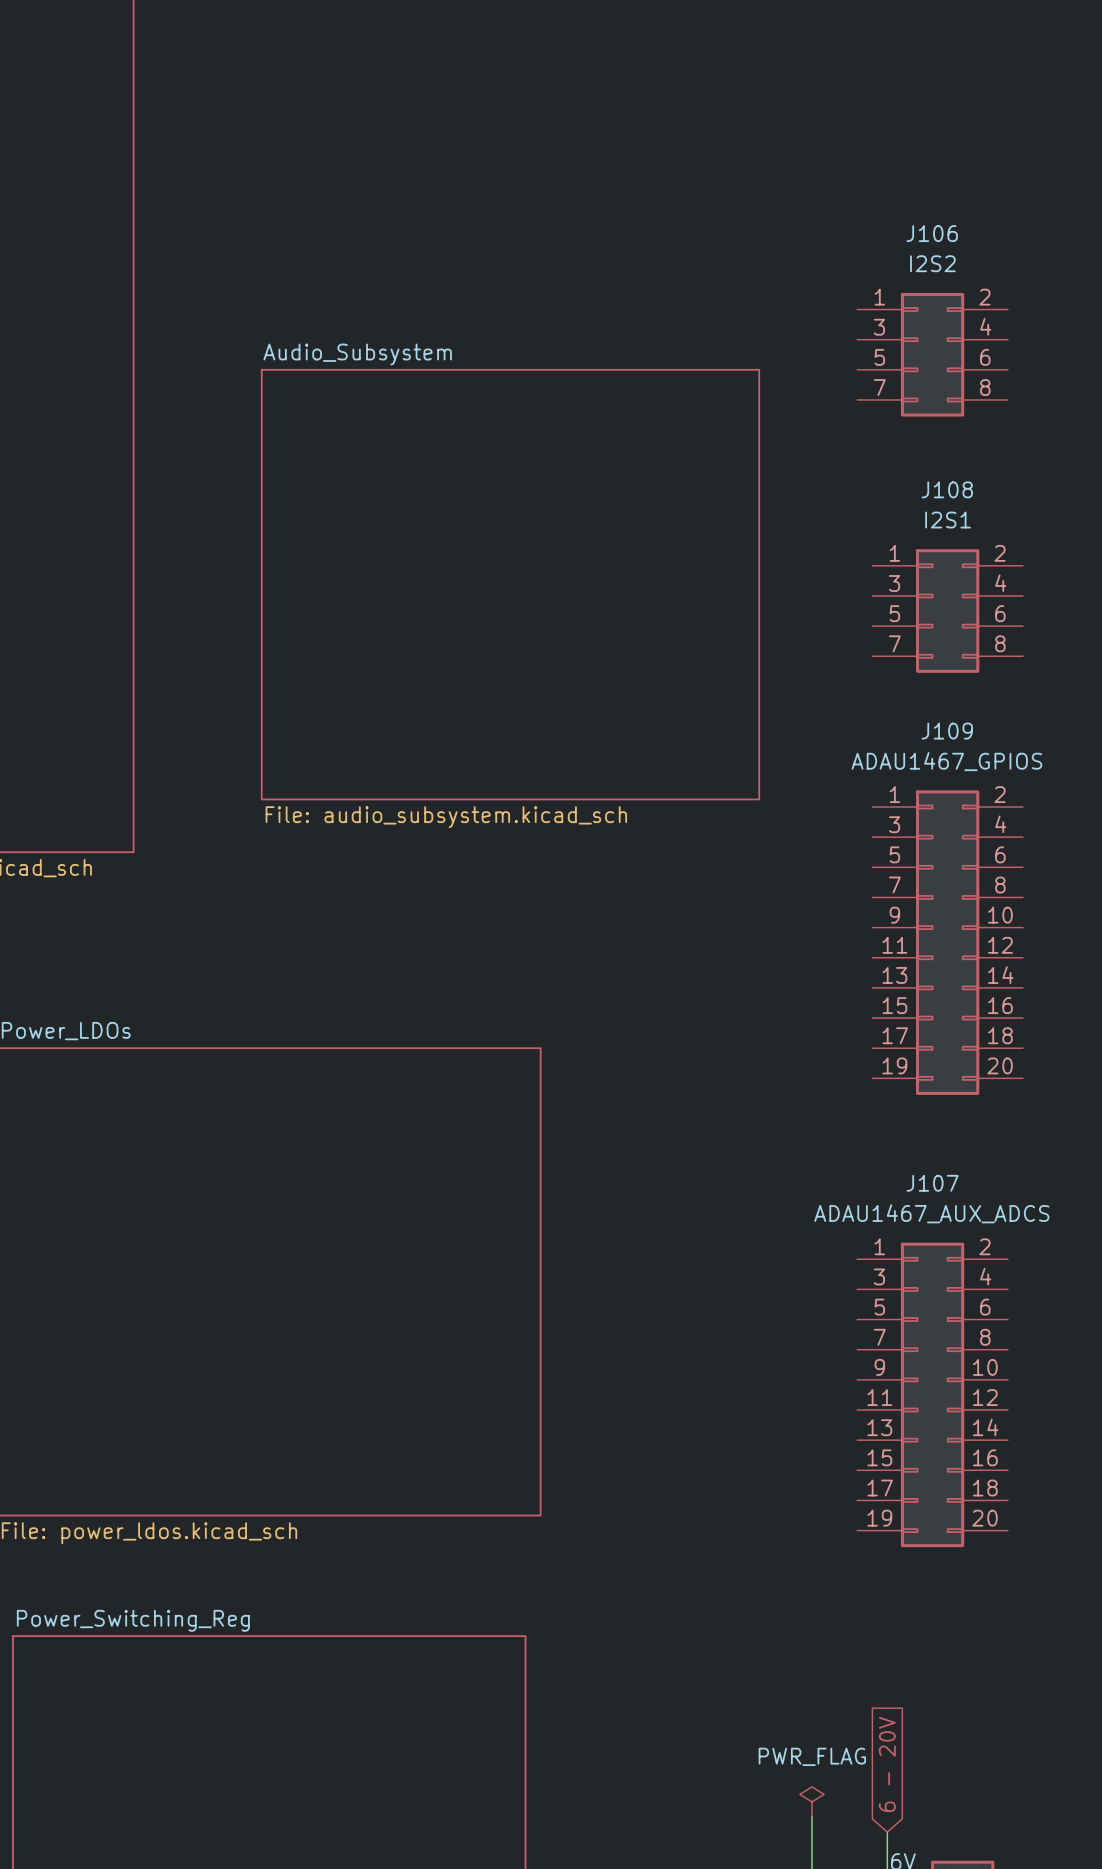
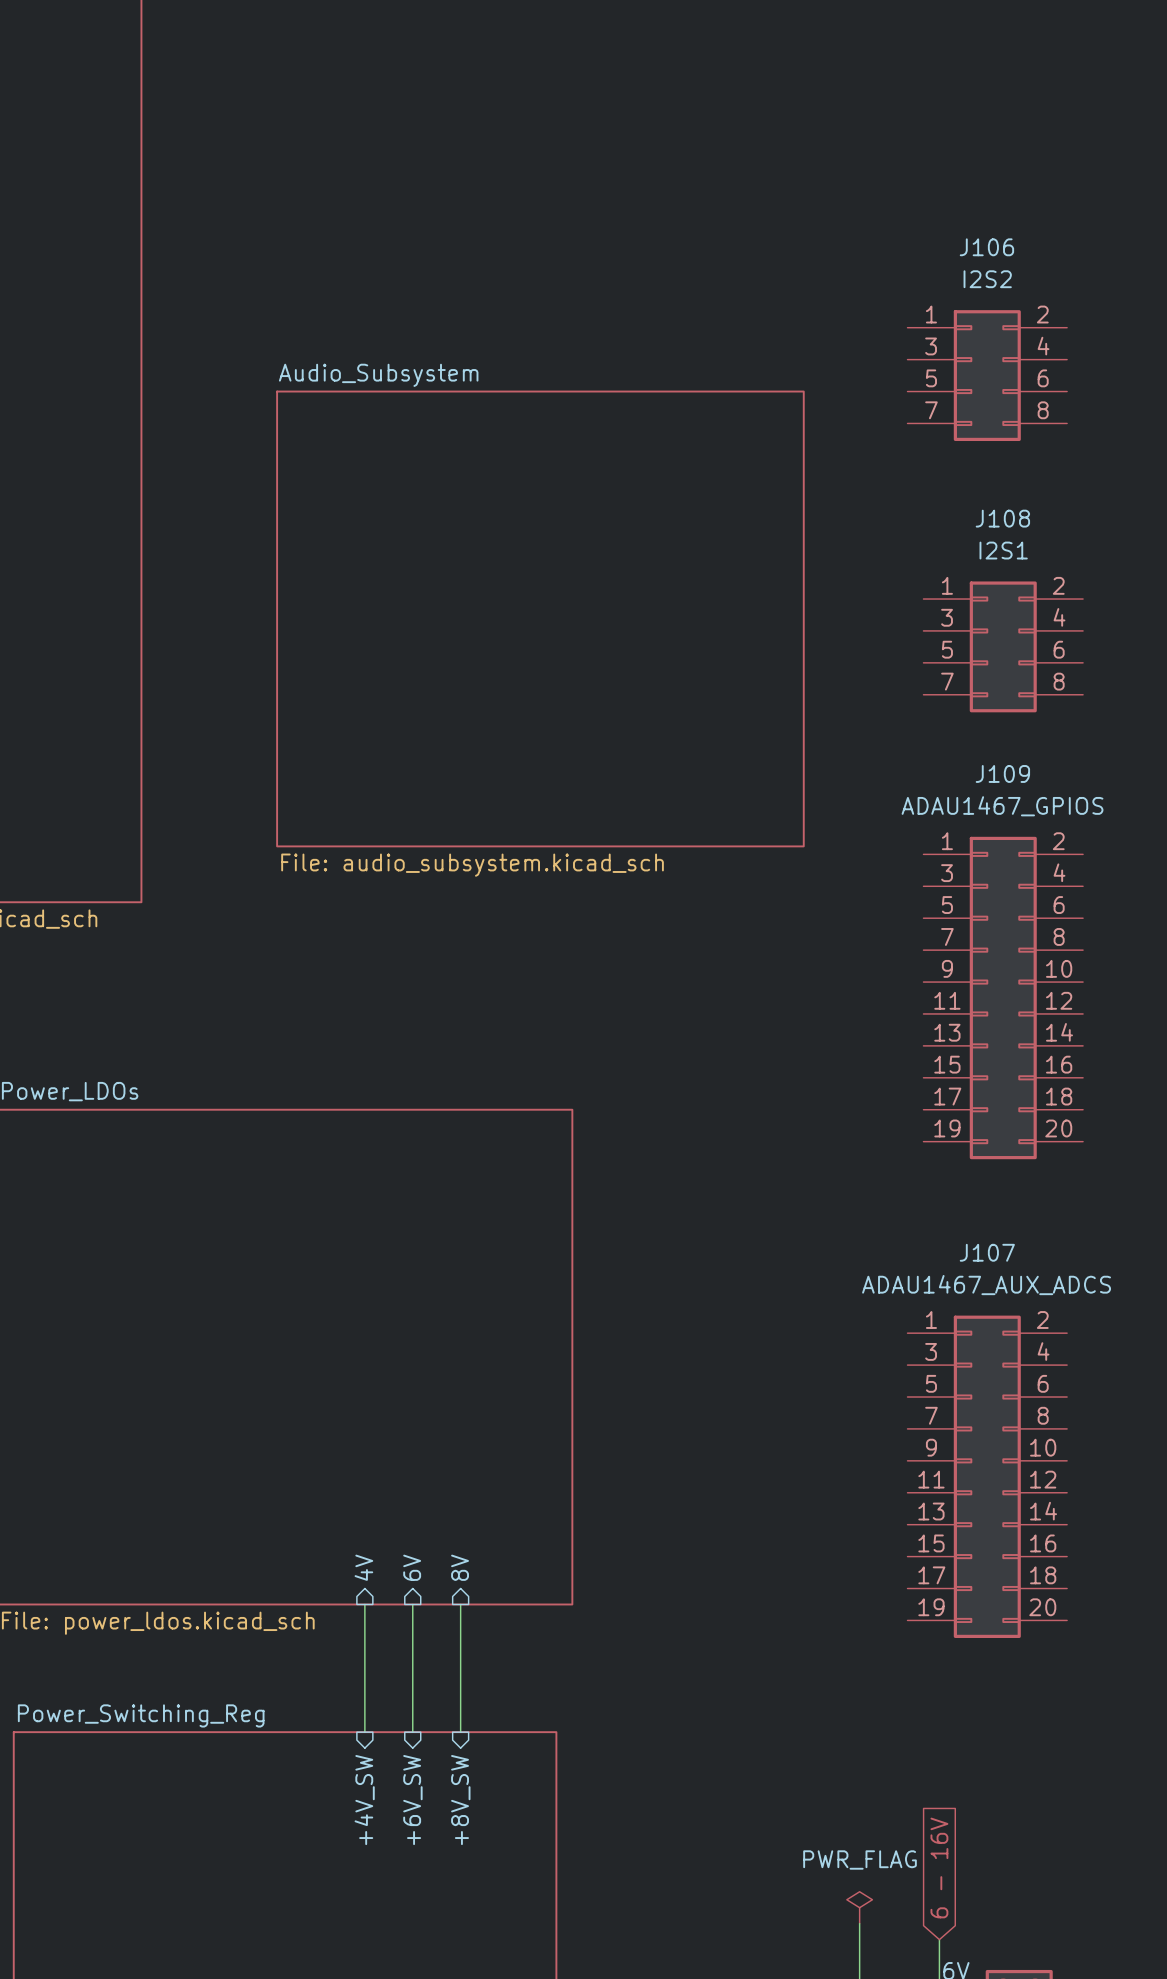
sheet pin: none -> 4V (363, 1567)
sheet pin: none -> 6V (412, 1567)
sheet pin: none -> 8V (460, 1567)
wire: none -> (364, 1604) (364, 1732)
wire: none -> (412, 1604) (412, 1732)
wire: none -> (460, 1604) (460, 1732)
sheet pin: none -> +4V_SW (364, 1800)
sheet pin: none -> +6V_SW (412, 1800)
sheet pin: none -> +8V_SW (460, 1800)
global label: 6 - 20V (887, 1764) -> 6 - 16V (939, 1867)

